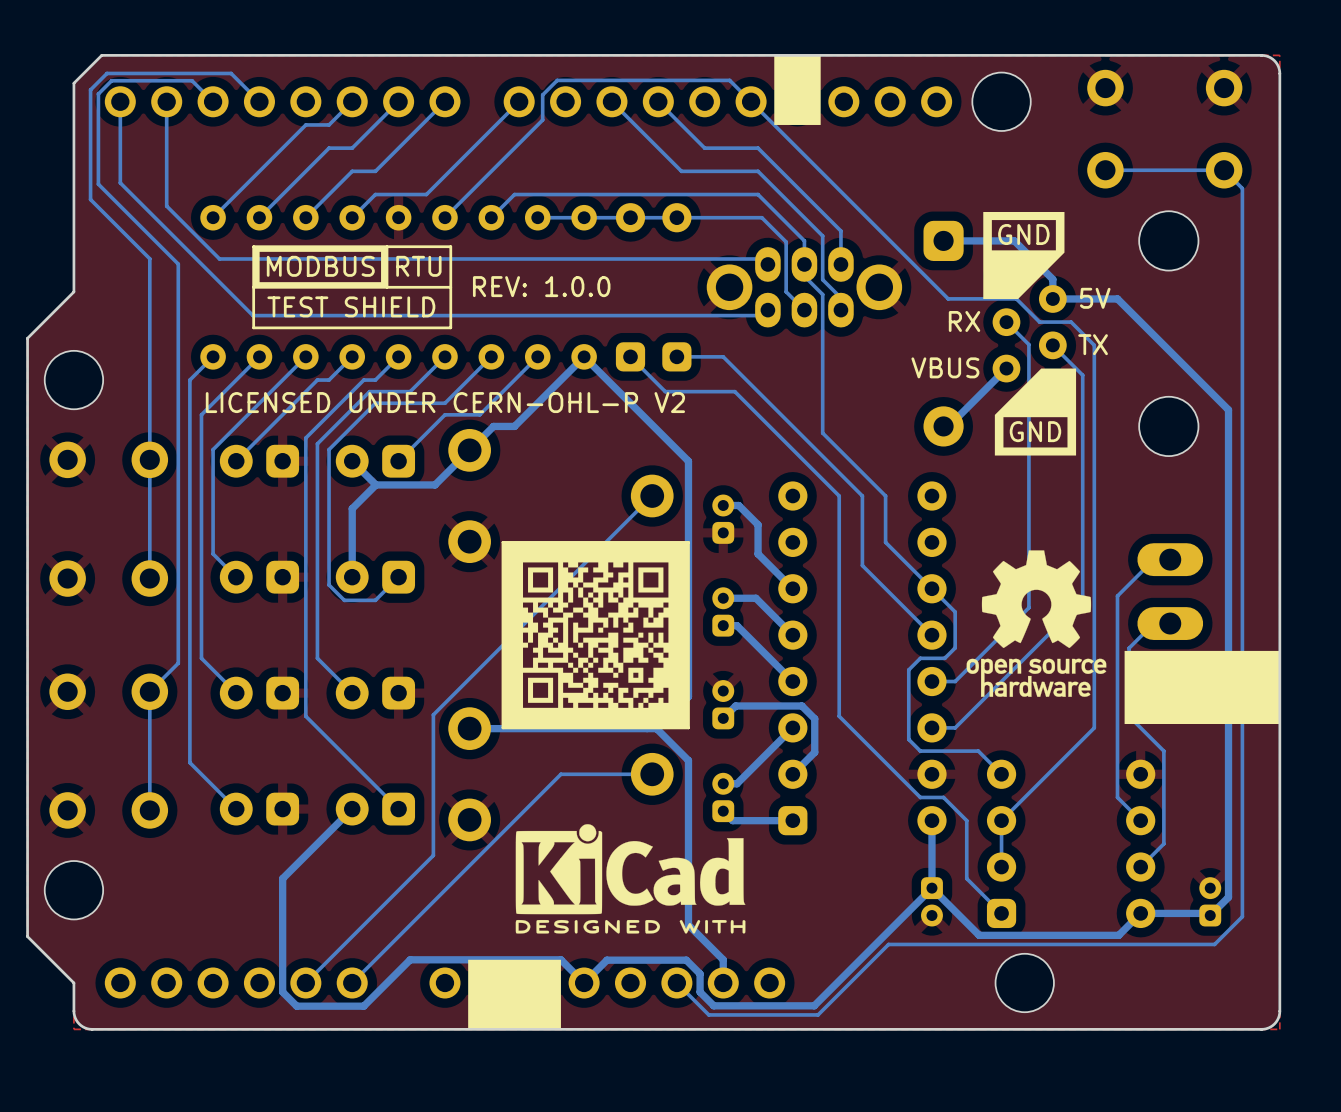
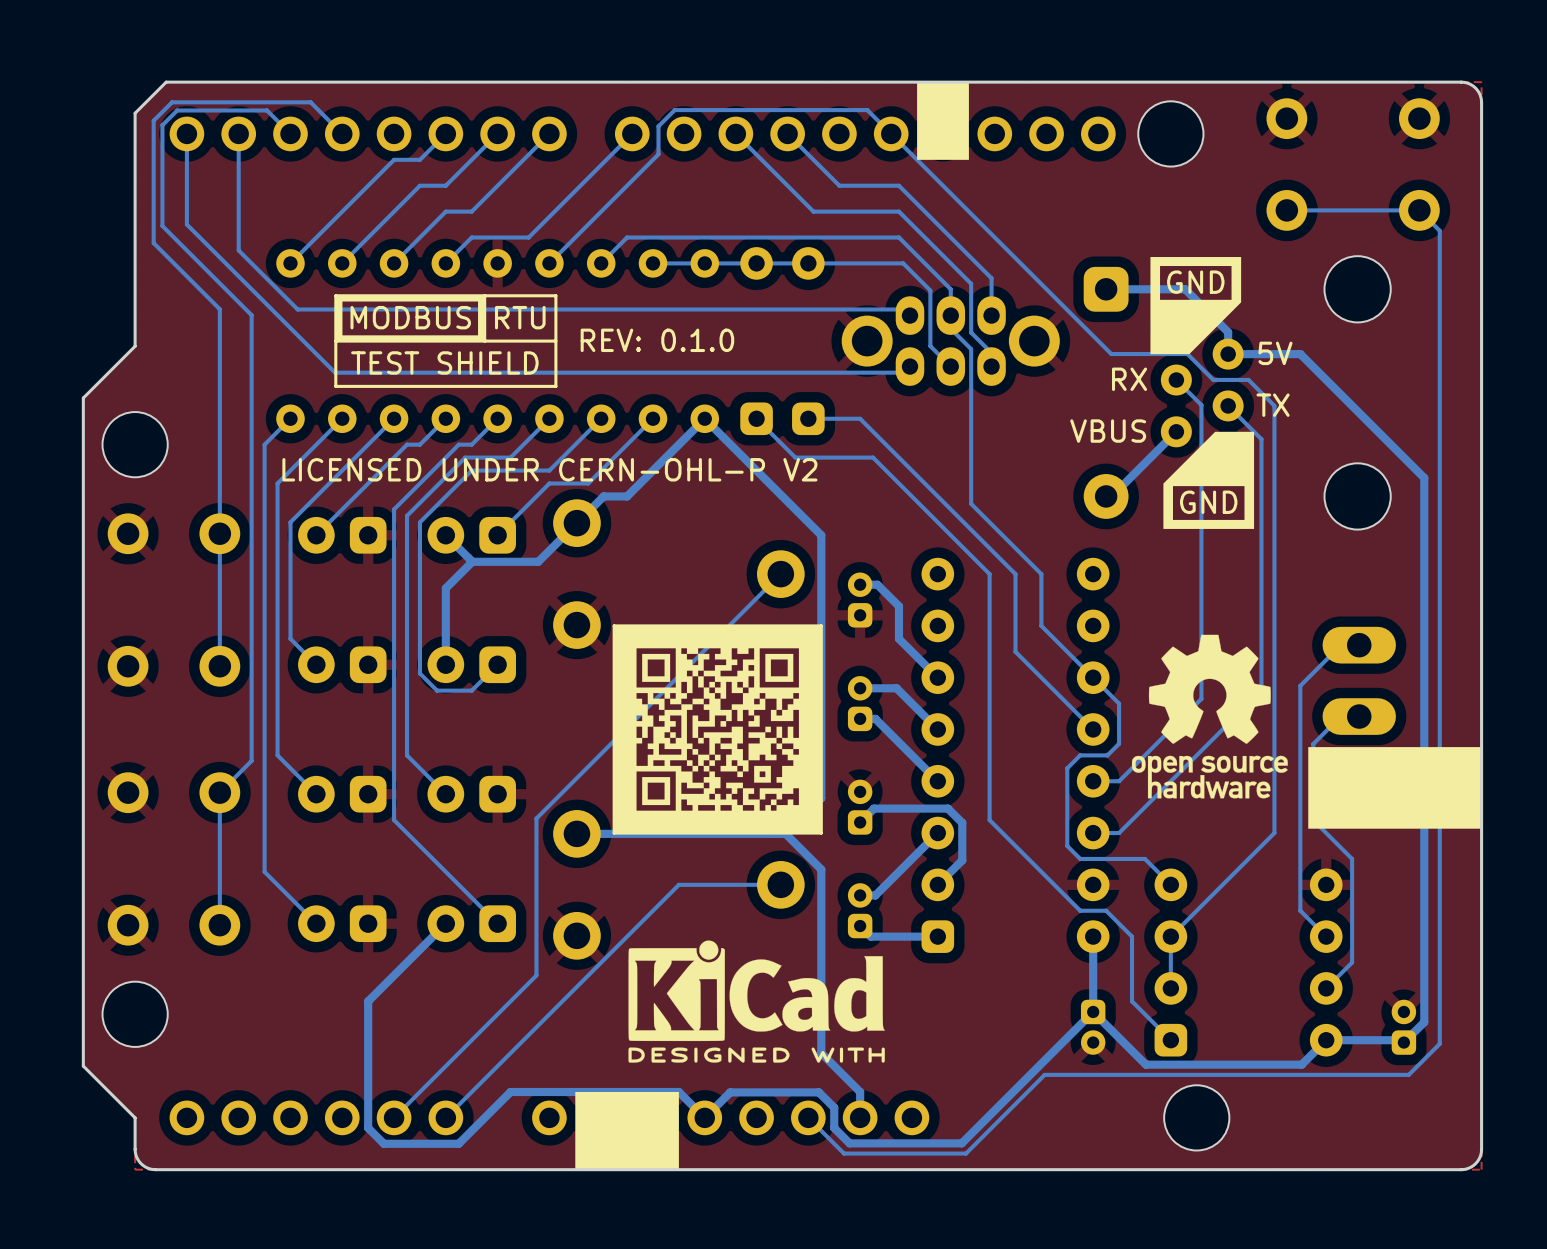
text: REV: 1.0.0 (541, 286) -> REV: 0.1.0 (657, 340)

